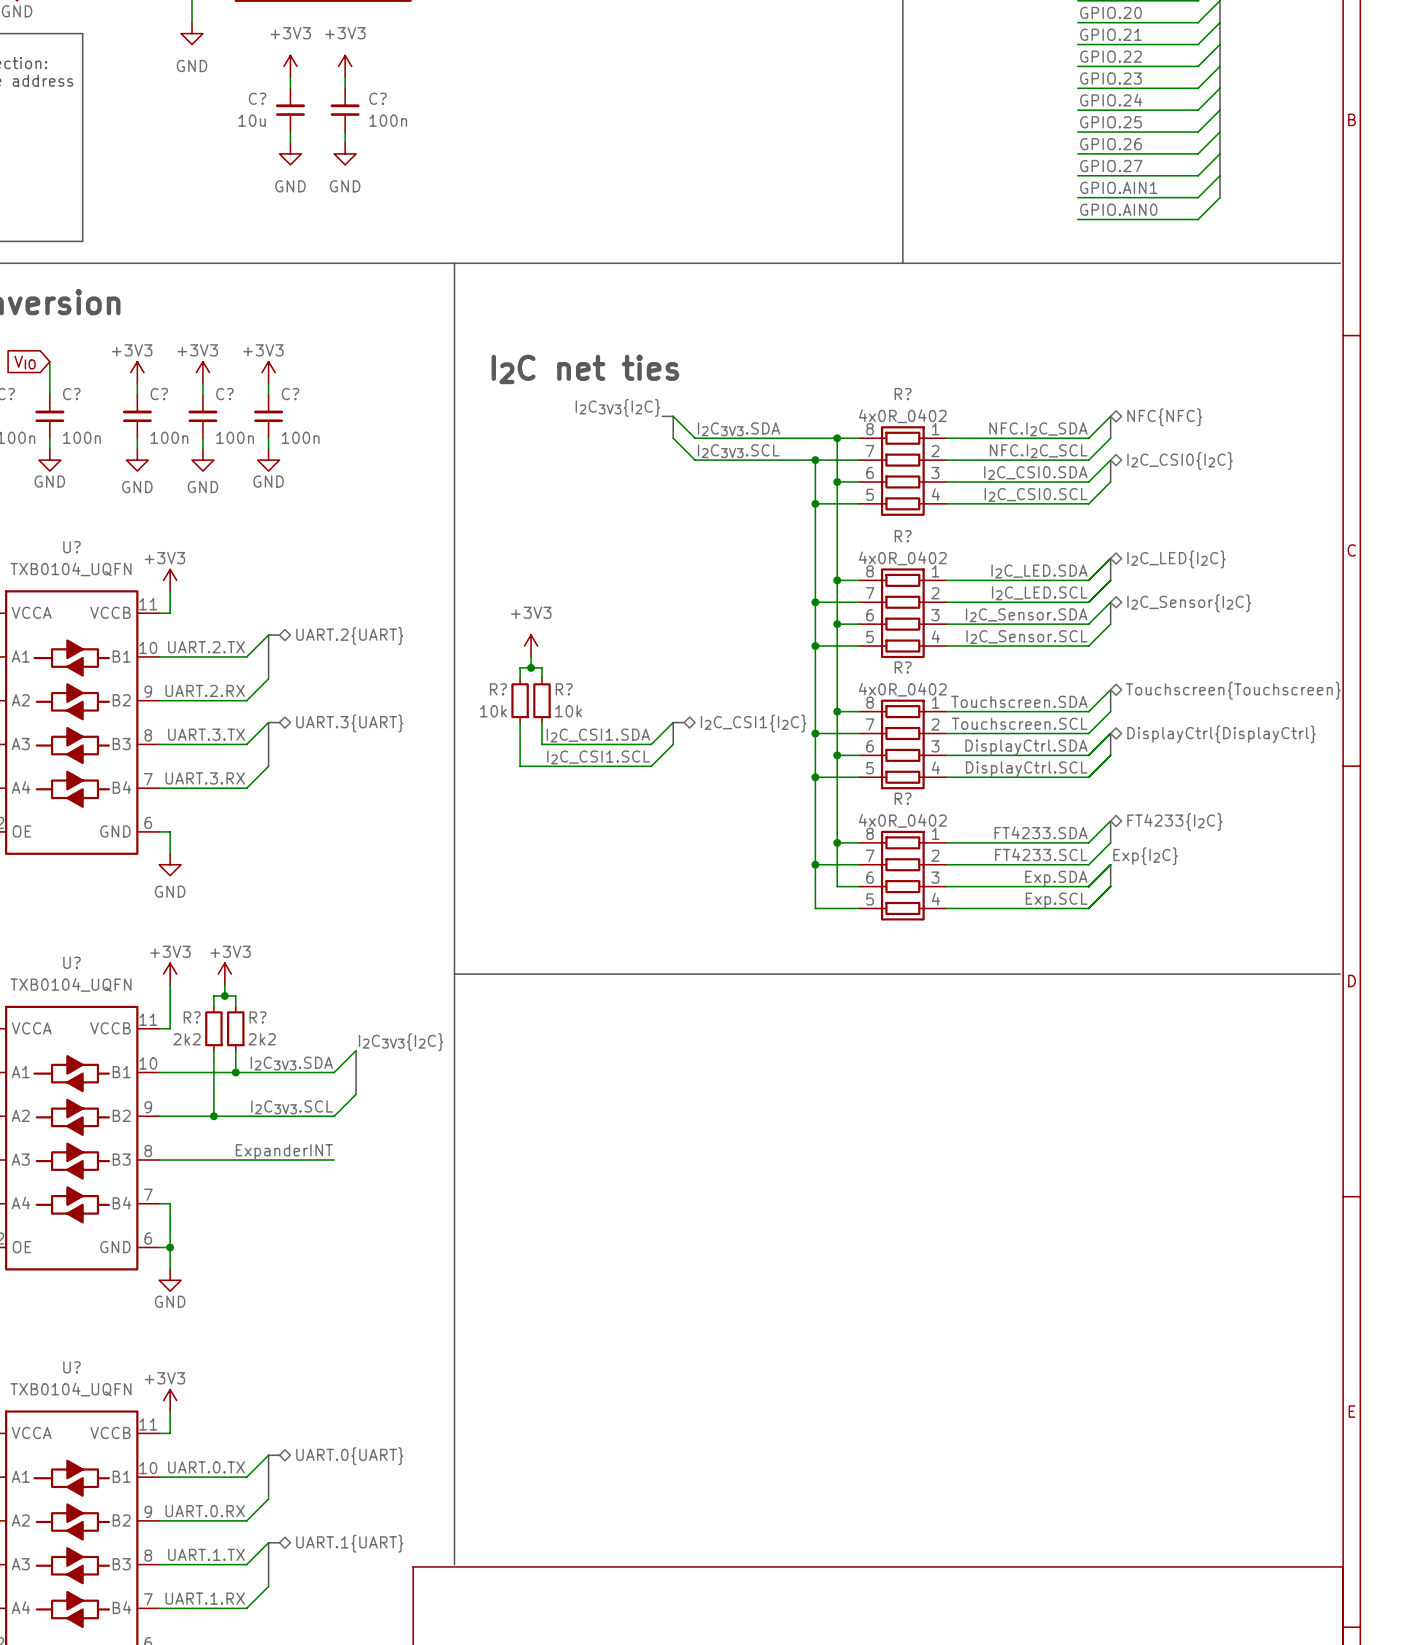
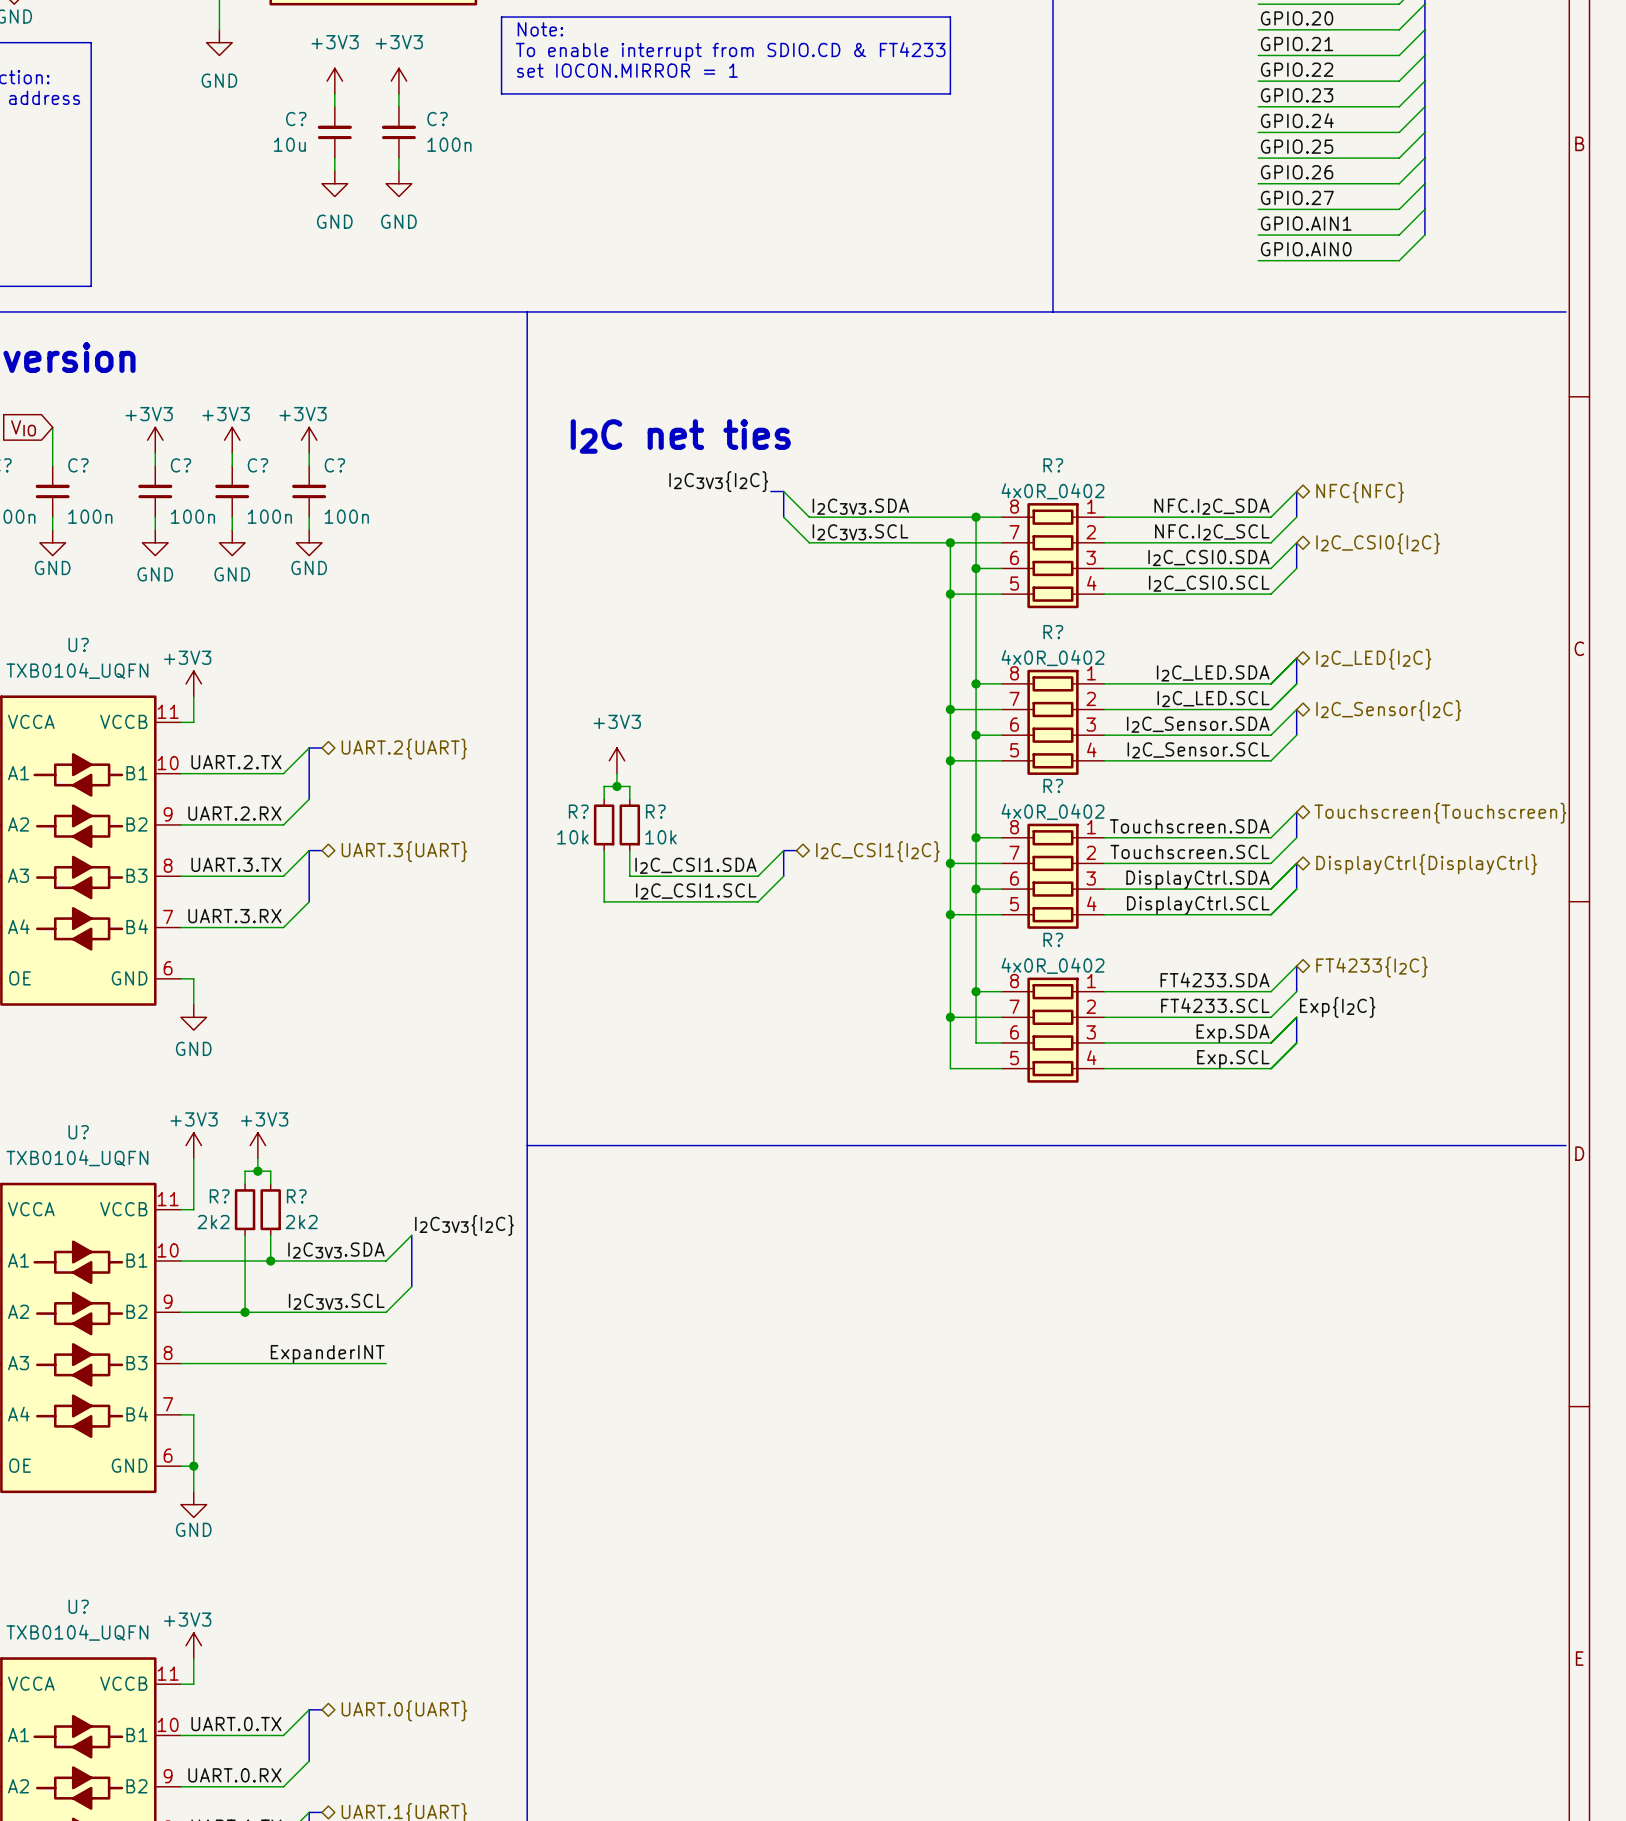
line: none -> (501, 17) (501, 93) (950, 93) (950, 17) (501, 17)
text: none -> Note: (540, 29)
text: none -> To enable interrupt from SDIO.CD & FT4233 (730, 51)
text: none -> set IOCON.MIRROR = 1 (627, 70)

